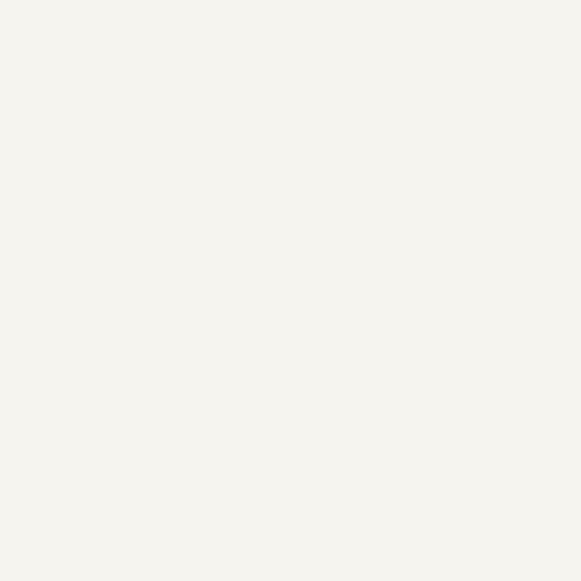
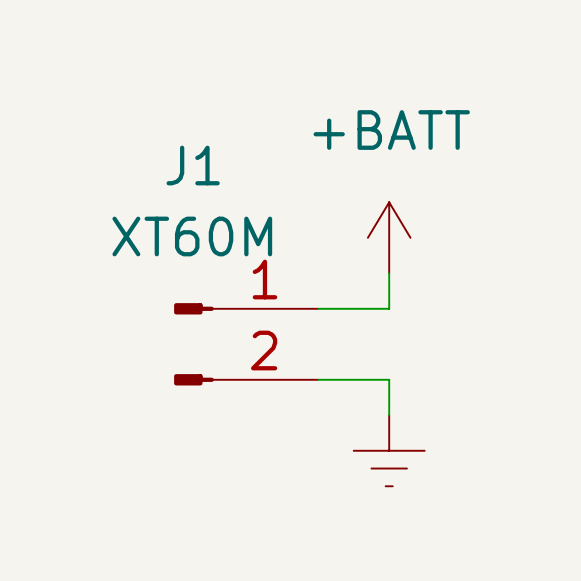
power symbol: none -> +BATT (389, 237)
wire: none -> (389, 273) (389, 308) (318, 308)
J1: none -> XT60M (246, 344)
wire: none -> (318, 379) (389, 379) (389, 415)
power symbol: none -> (389, 450)

